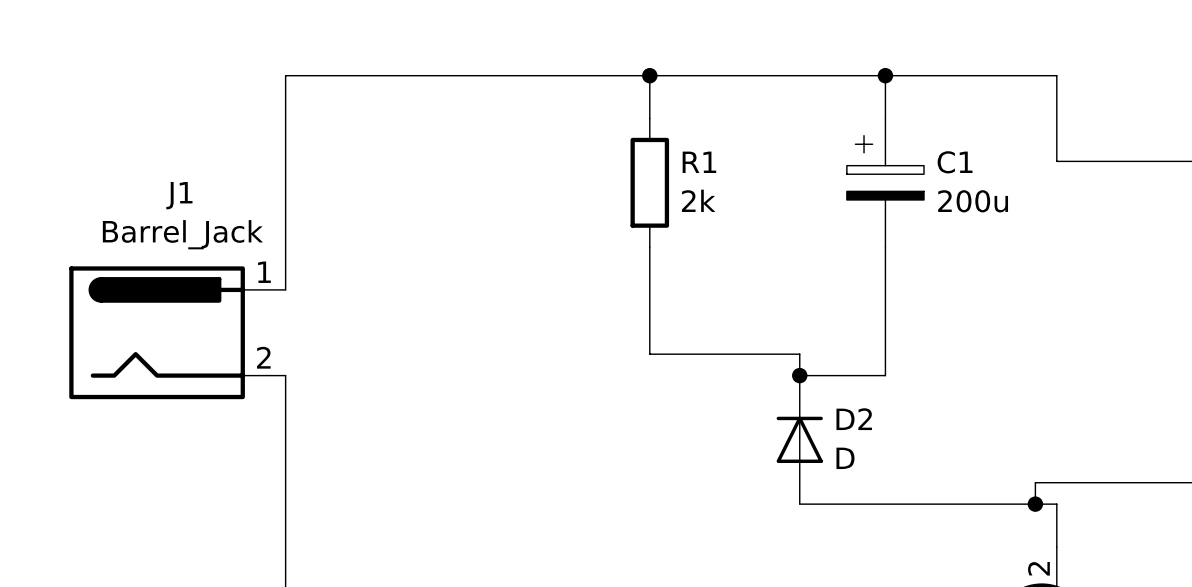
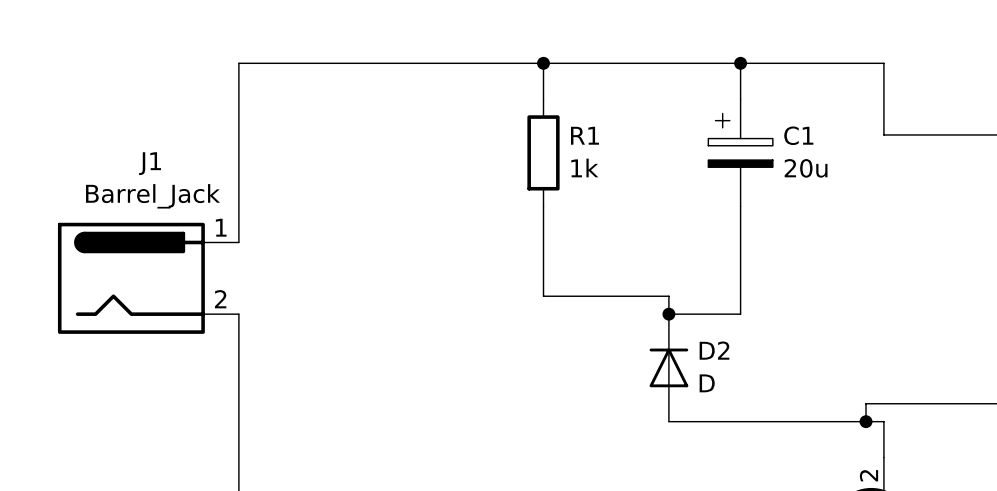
R1 value: 2k (698, 200) -> 1k (584, 167)
C1 value: 200u (973, 201) -> 20u (806, 168)

